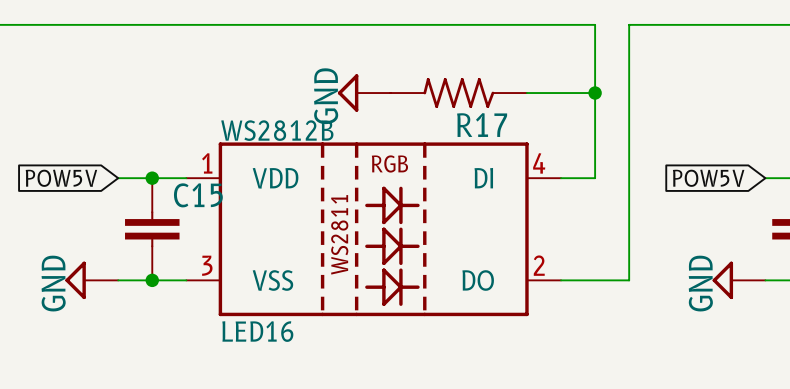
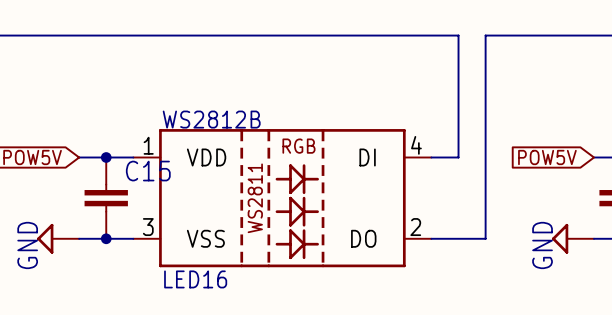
power symbol: GND (364, 93) -> none
R17: (458, 93) -> none
wire: (526, 93) (595, 93) -> none
junction: (595, 93) -> none

